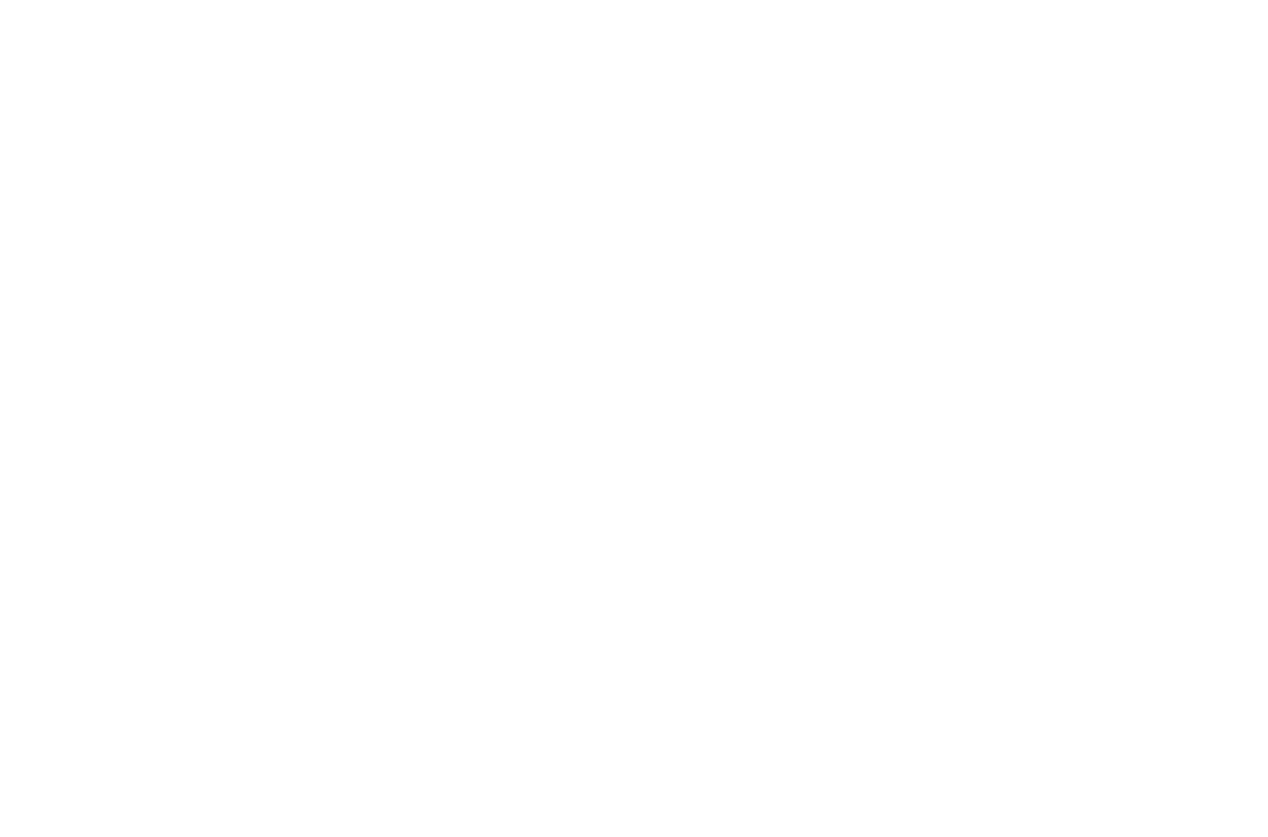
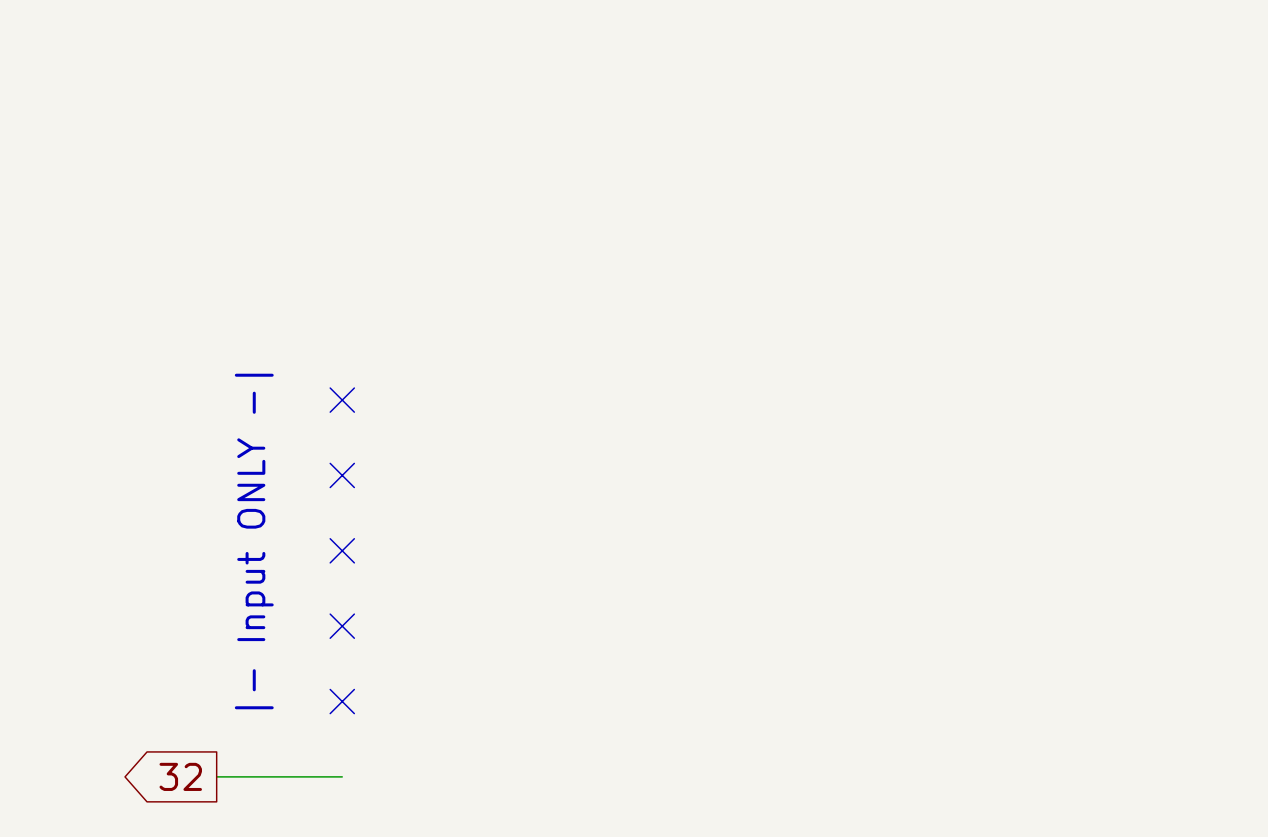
no-connect mark: none -> (342, 400)
no-connect mark: none -> (342, 475)
text: none -> |- Input ONLY -| (254, 541)
no-connect mark: none -> (342, 550)
no-connect mark: none -> (342, 626)
no-connect mark: none -> (342, 701)
global label: none -> 32 (180, 776)
wire: none -> (216, 776) (342, 776)

